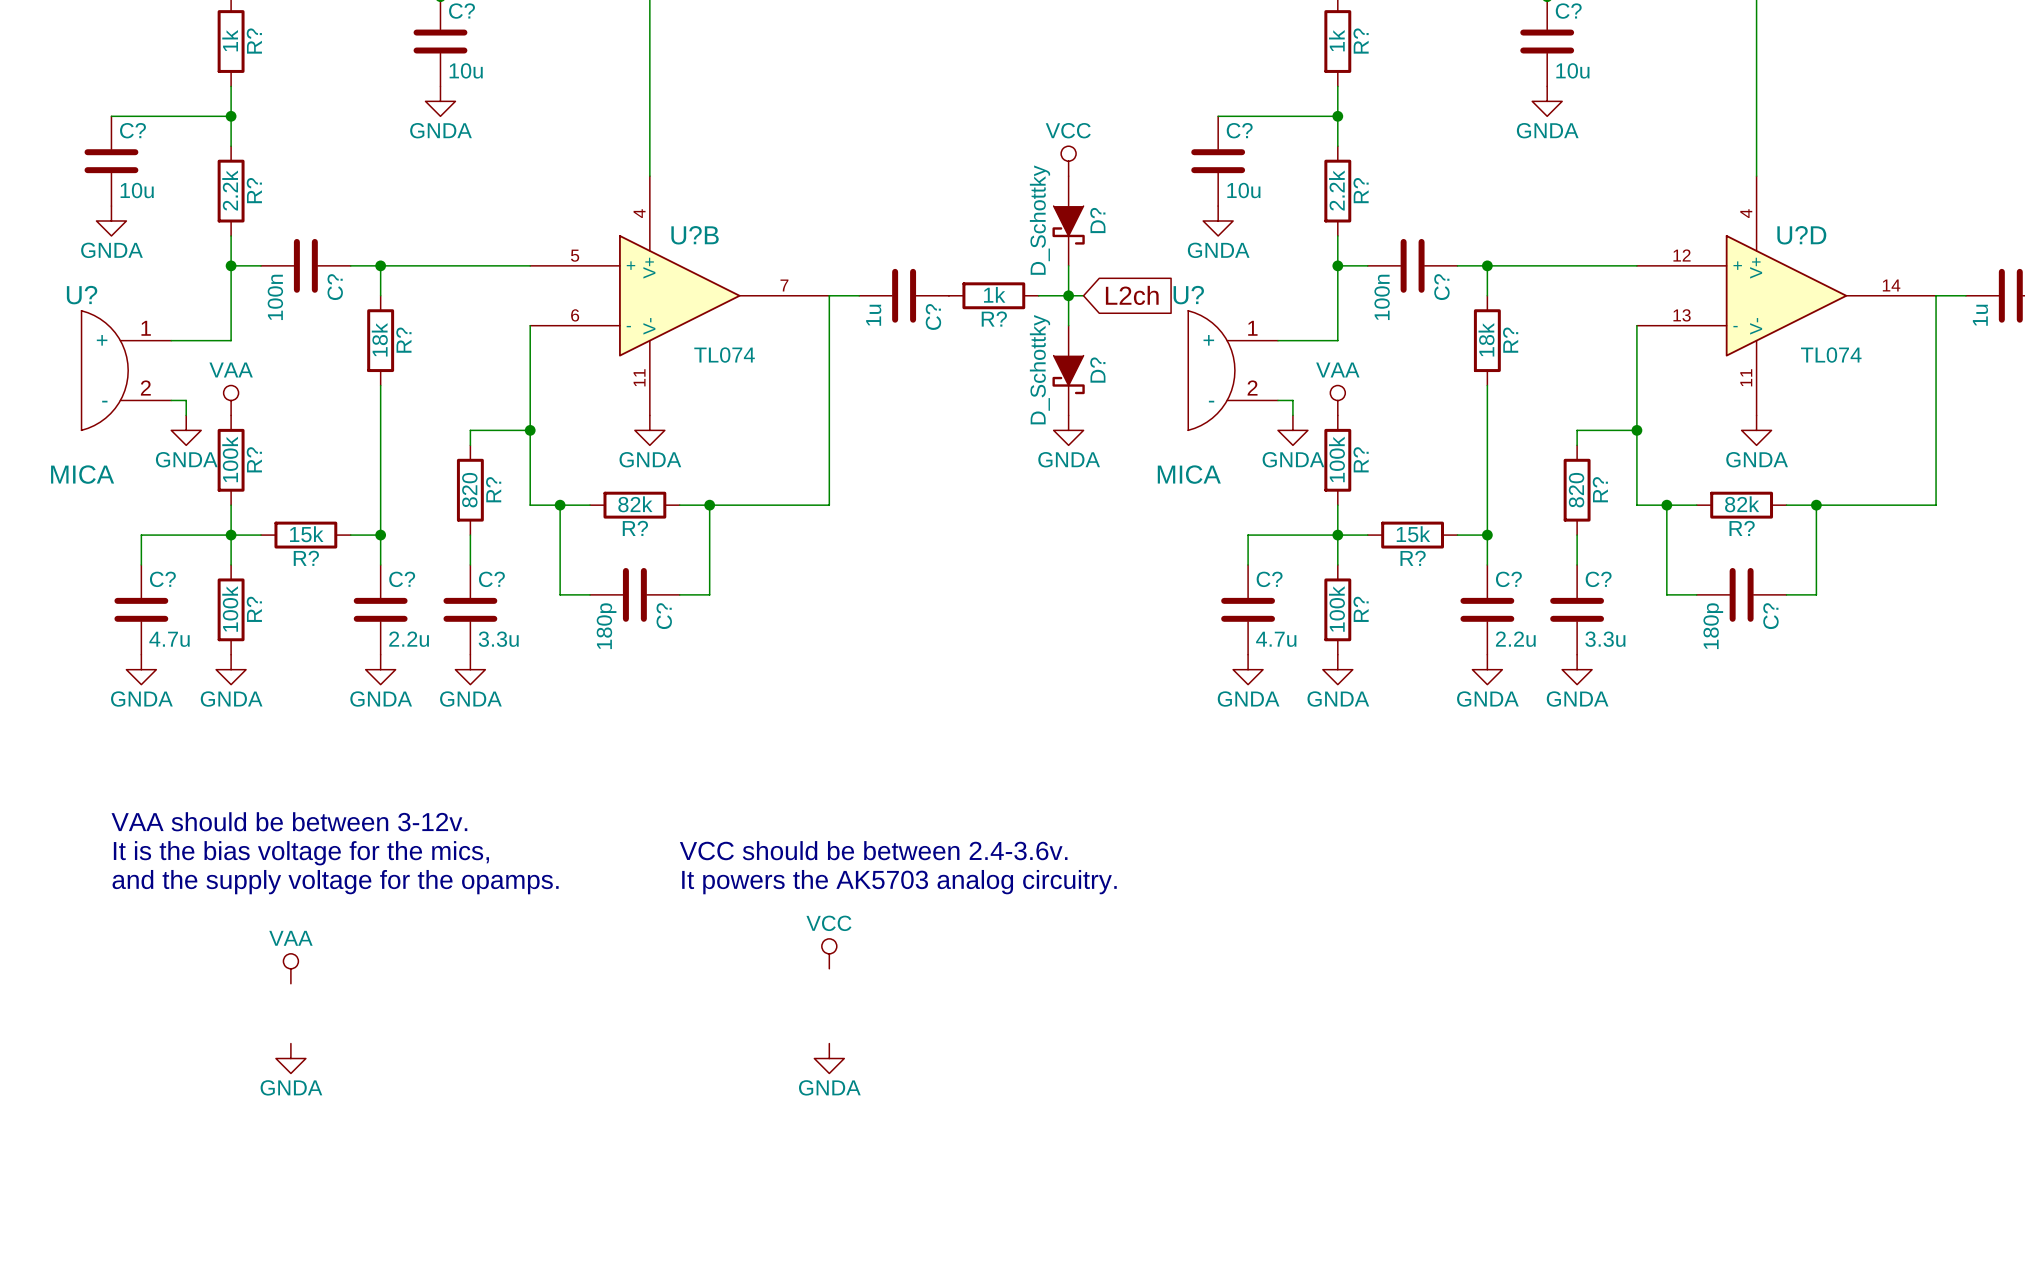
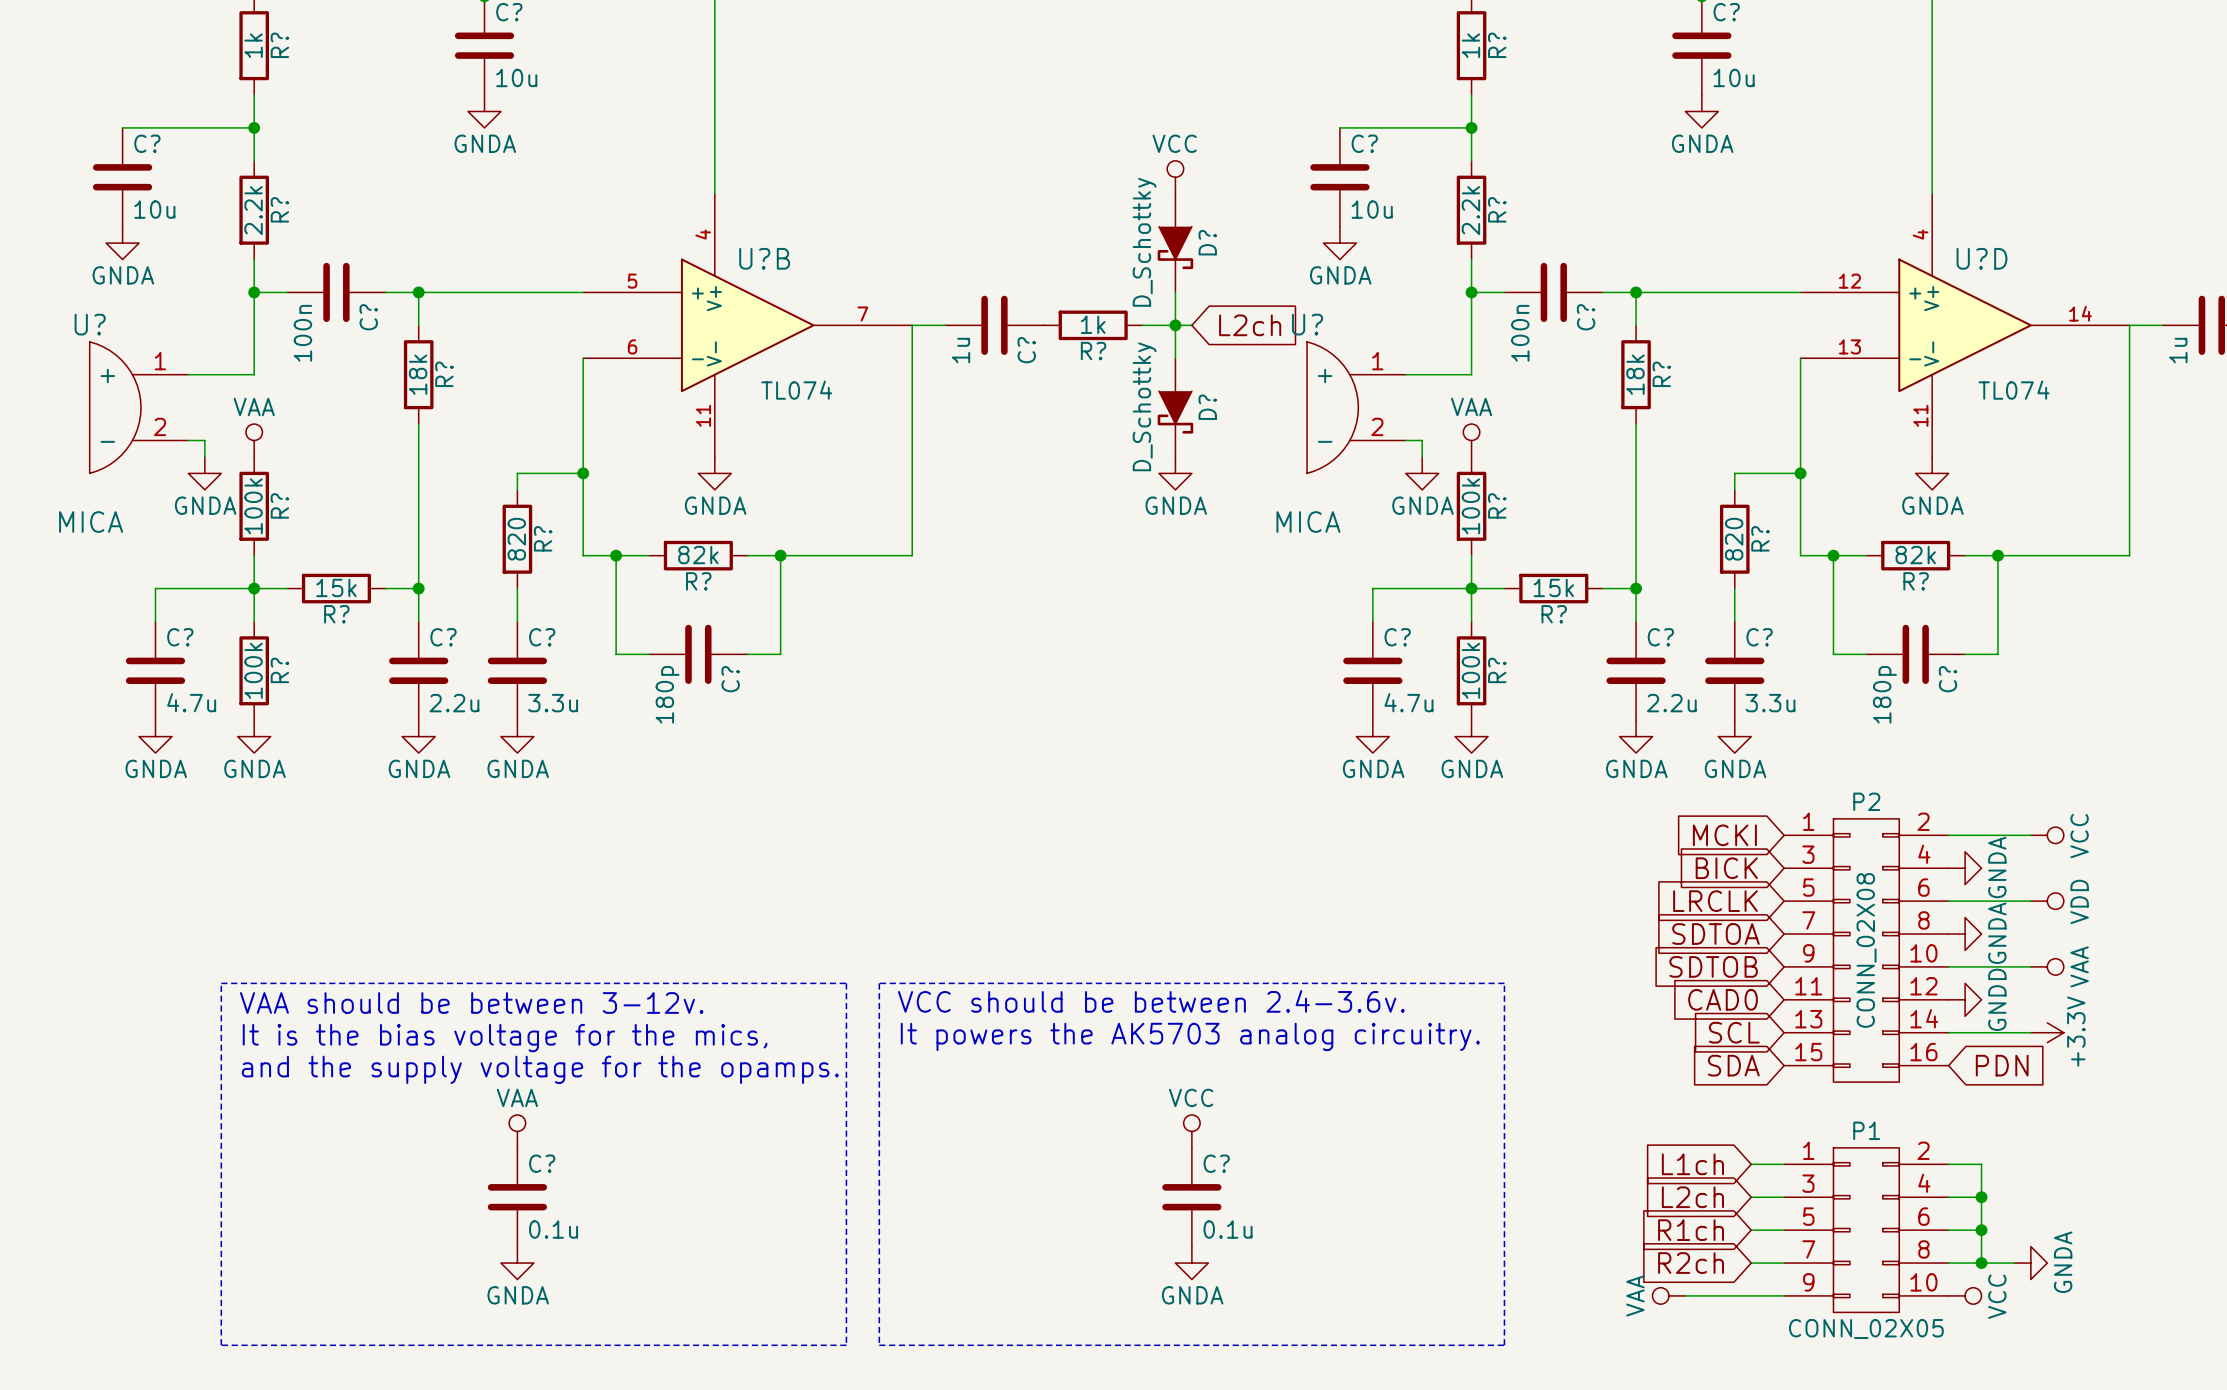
global label: none -> MCKI (1724, 835)
wire: none -> (1948, 835) (2030, 835)
power symbol: none -> VCC (2047, 835)
global label: none -> BICK (1726, 868)
power symbol: none -> GNDA (1965, 868)
global label: none -> LRCLK (1715, 901)
wire: none -> (1948, 901) (2030, 901)
power symbol: none -> VDD (2047, 901)
text position: VAA should be between 3-12v. (289, 821) -> VAA should be between 3-12v. (471, 1002)
global label: none -> SDTOA (1715, 934)
power symbol: none -> GNDA (1965, 934)
text position: VCC should be between 2.4-3.6v. (873, 850) -> VCC should be between 2.4-3.6v. (1151, 1001)
text position: It is the bias voltage for the mics, (301, 853) -> It is the bias voltage for the mics, (505, 1038)
P2: none -> CONN_02X08 (1866, 950)
global label: none -> SDTOB (1713, 966)
wire: none -> (1948, 966) (2030, 966)
power symbol: none -> VAA (2047, 966)
text position: and the supply voltage for the opamps. (335, 882) -> and the supply voltage for the opamps. (540, 1069)
text position: It powers the AK5703 analog circuitry. (899, 882) -> It powers the AK5703 analog circuitry. (1190, 1036)
line: none -> (221, 983) (846, 983) (846, 1345) (221, 1345) (221, 983)
line: none -> (879, 983) (879, 1345) (1504, 1345) (1504, 983) (879, 983)
global label: none -> CAD0 (1723, 999)
power symbol: none -> GNDD (1965, 999)
global label: none -> SCL (1734, 1032)
wire: none -> (1948, 1032) (2030, 1032)
power symbol: none -> +3.3V (2047, 1032)
power symbol position: VCC (829, 953) -> VCC (1191, 1131)
power symbol position: VAA (290, 968) -> VAA (517, 1131)
global label: none -> SDA (1733, 1065)
global label: none -> PDN (2002, 1065)
power symbol: GNDA (290, 1058) -> none
power symbol: GNDA (829, 1058) -> none
global label: none -> L1ch (1692, 1164)
wire: none -> (1751, 1164) (1784, 1164)
wire: none -> (1948, 1164) (1981, 1164) (1981, 1263)
C?: none -> 0.1u (517, 1197)
C?: none -> 0.1u (1191, 1197)
global label: none -> L2ch (1692, 1197)
wire: none -> (1751, 1197) (1784, 1197)
wire: none -> (1948, 1197) (1981, 1197)
junction: none -> (1981, 1197)
global label: none -> R1ch (1691, 1230)
wire: none -> (1751, 1230) (1784, 1230)
P1: none -> CONN_02X05 (1866, 1230)
wire: none -> (1948, 1230) (1981, 1230)
junction: none -> (1981, 1230)
global label: none -> R2ch (1691, 1263)
power symbol: none -> GNDA (517, 1263)
power symbol: none -> GNDA (1191, 1263)
wire: none -> (1751, 1263) (1784, 1263)
wire: none -> (1948, 1263) (2014, 1263)
junction: none -> (1981, 1263)
power symbol: none -> GNDA (2030, 1263)
power symbol: none -> VAA (1668, 1295)
wire: none -> (1685, 1295) (1784, 1295)
power symbol: none -> VCC (1965, 1295)

